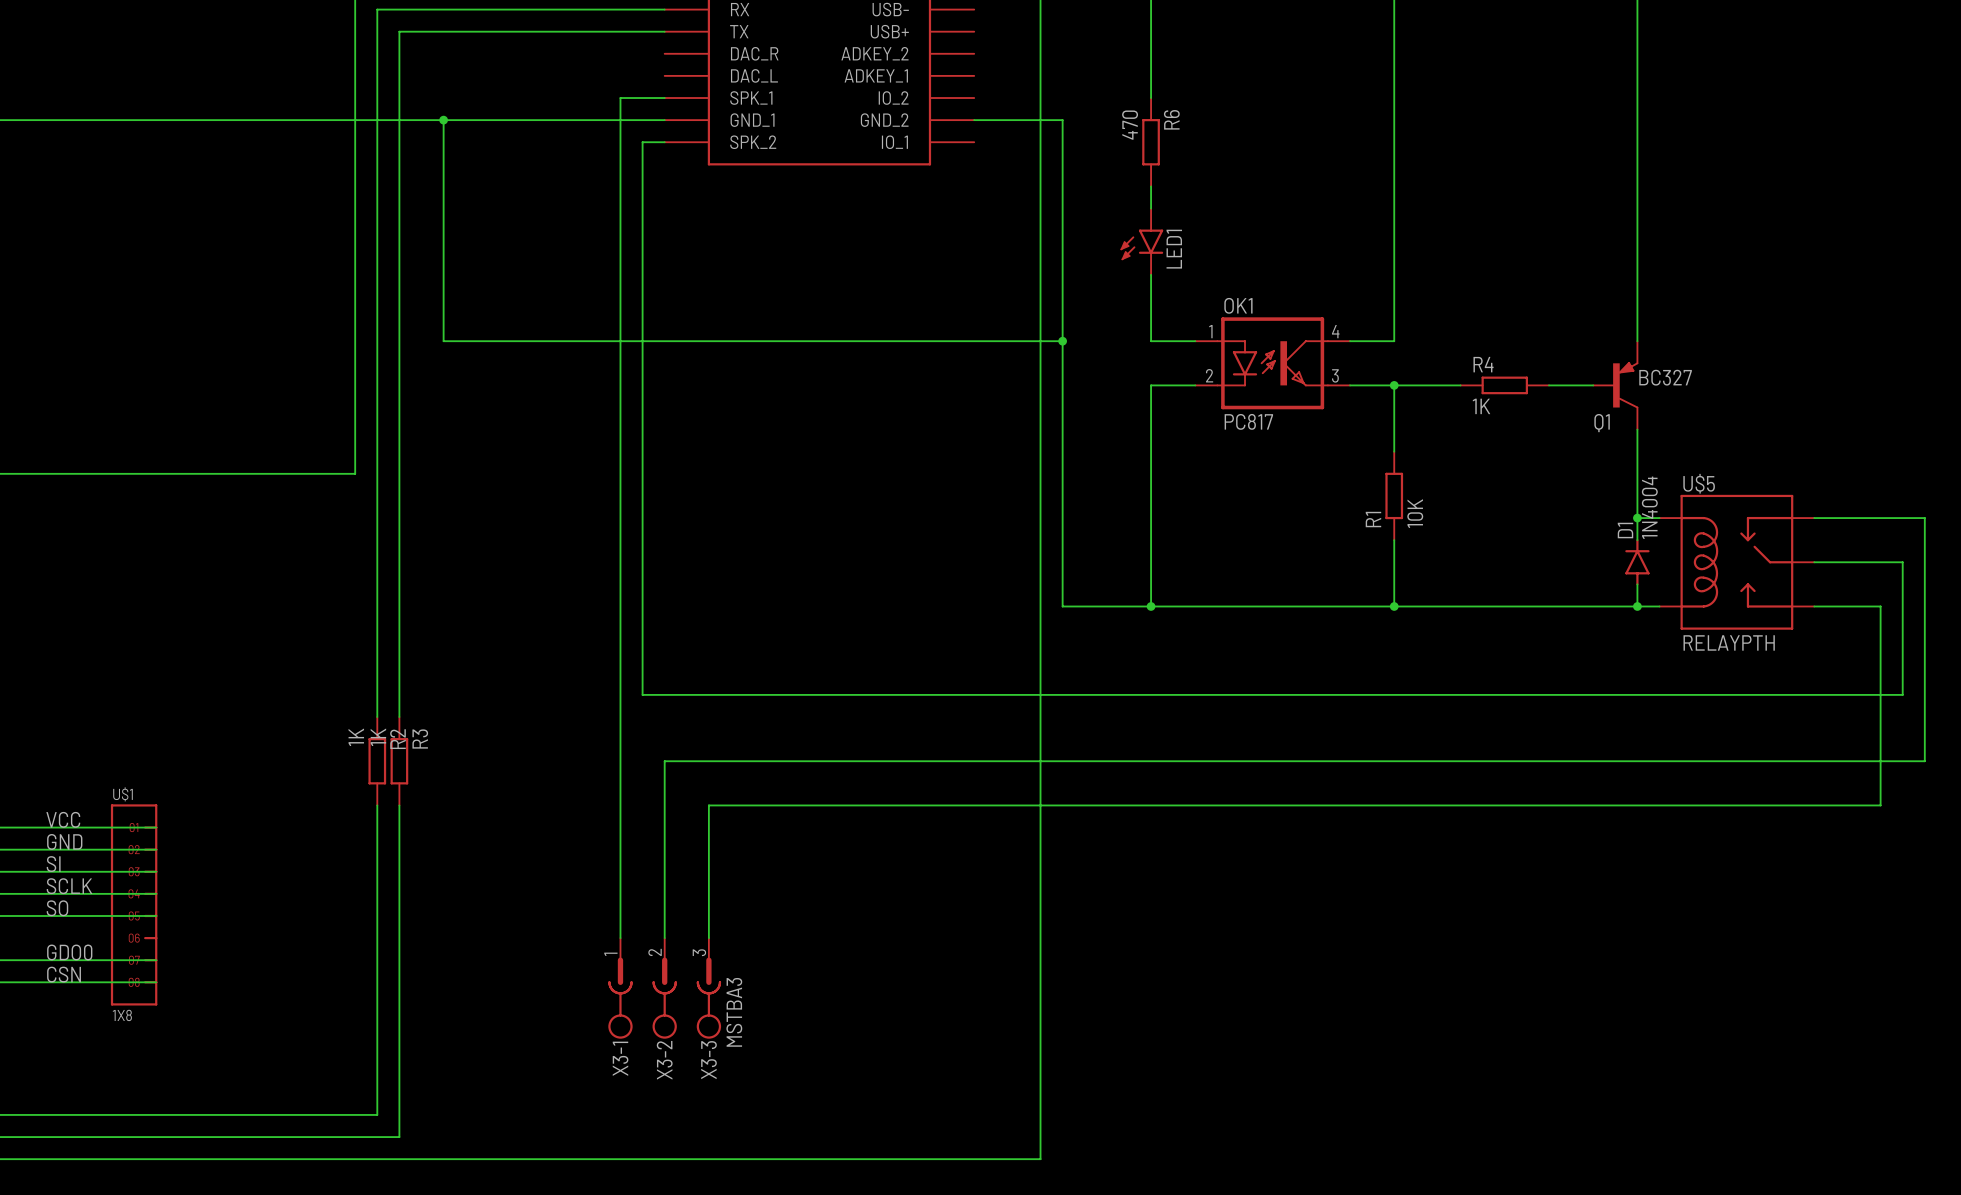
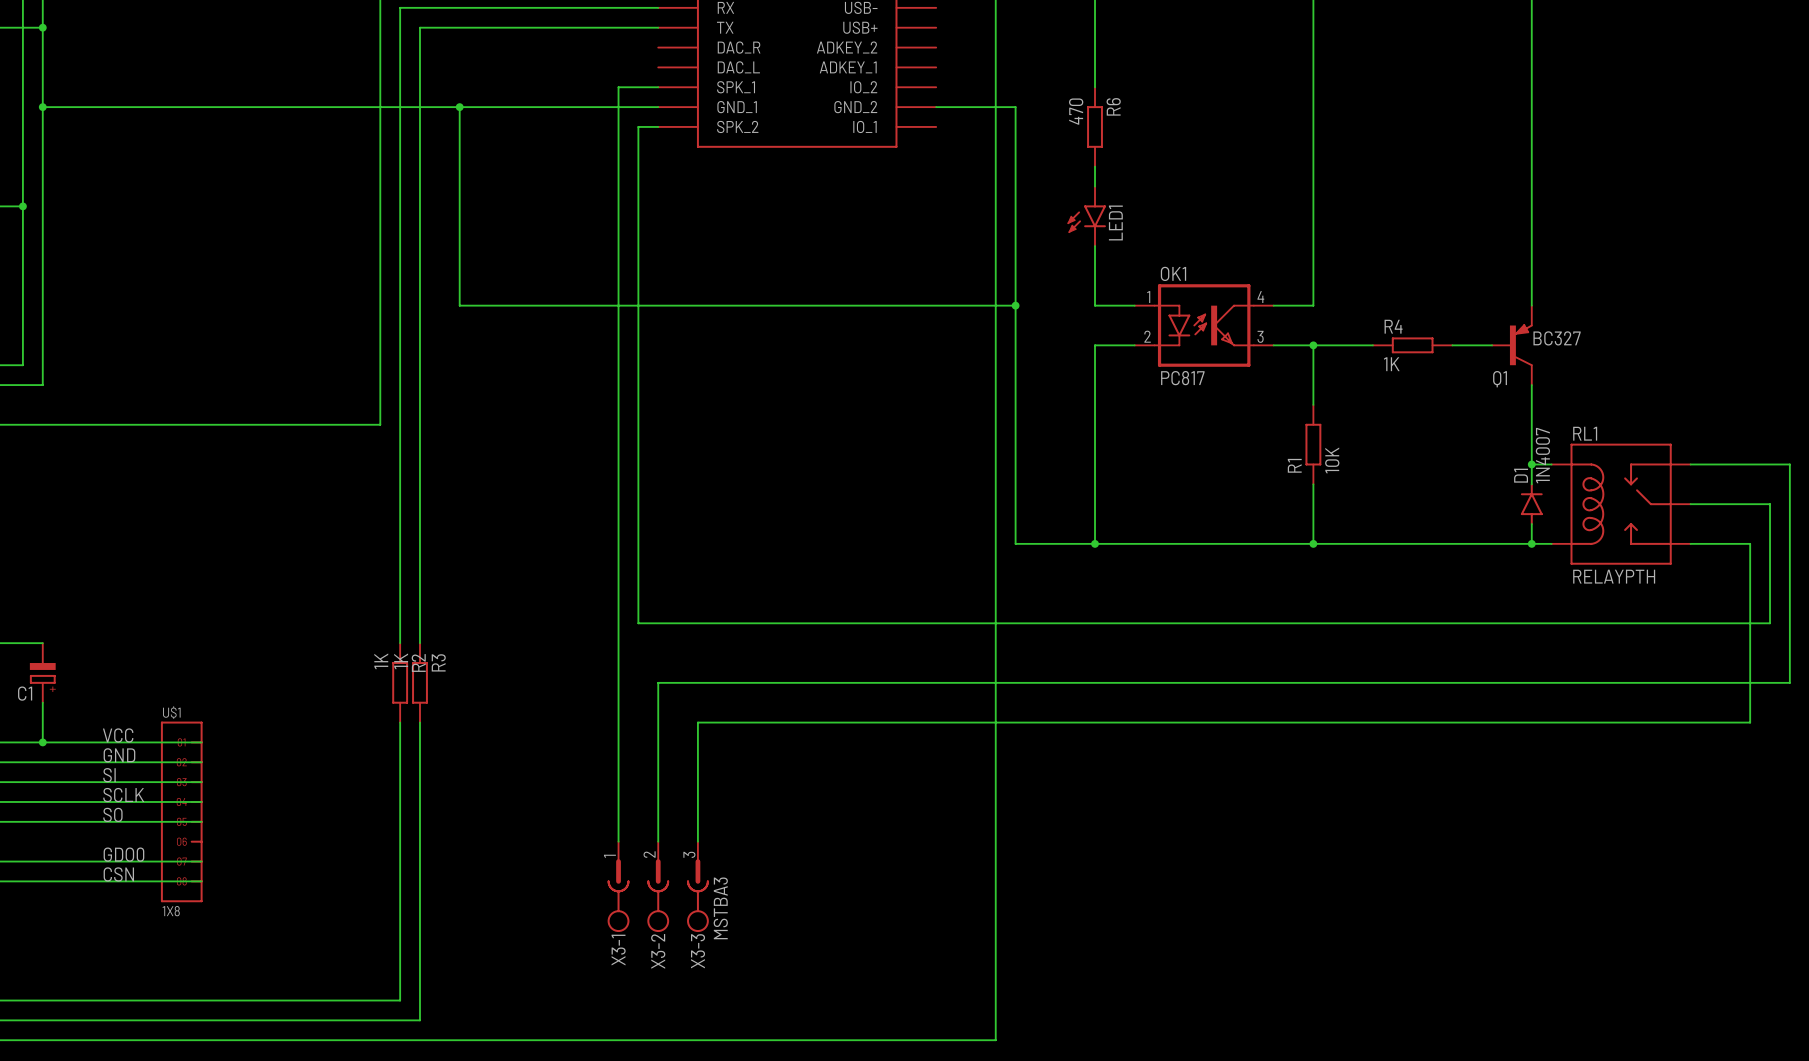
U$5 name: U$5 (1699, 483) -> RL1 (1585, 433)
D1 value: 1N4004 (1649, 507) -> 1N4007 (1542, 455)

